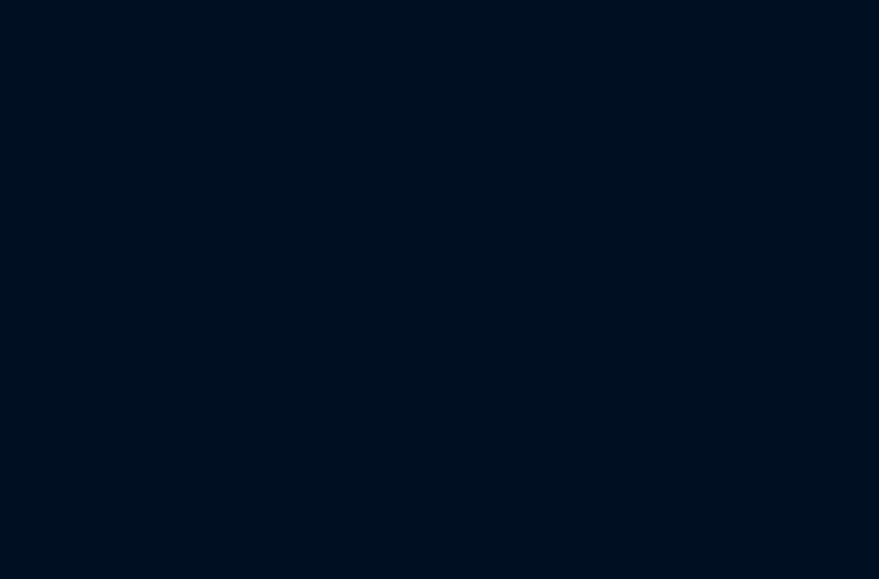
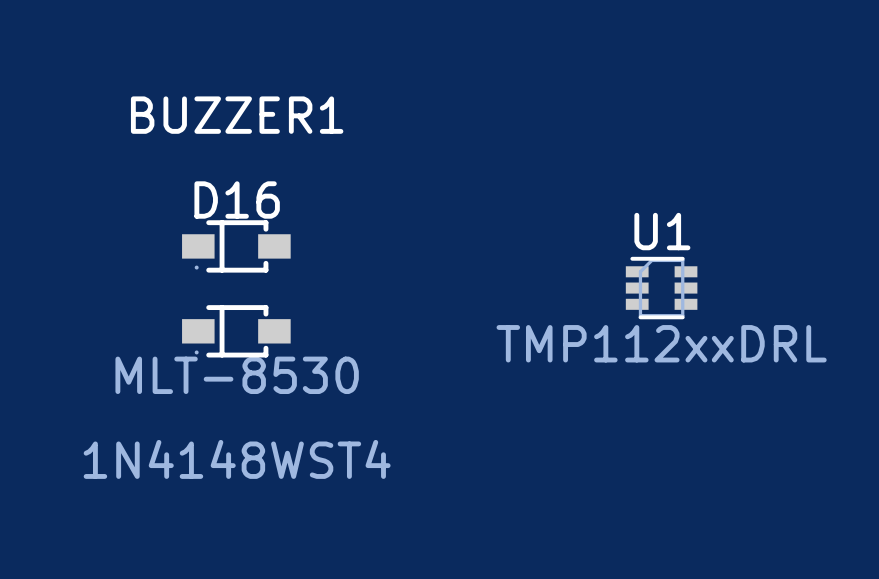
BUZZER1: none -> MLT-8530 (236, 246)
U1: none -> TMP112xxDRL (661, 288)
D16: none -> 1N4148WST4 (236, 331)

